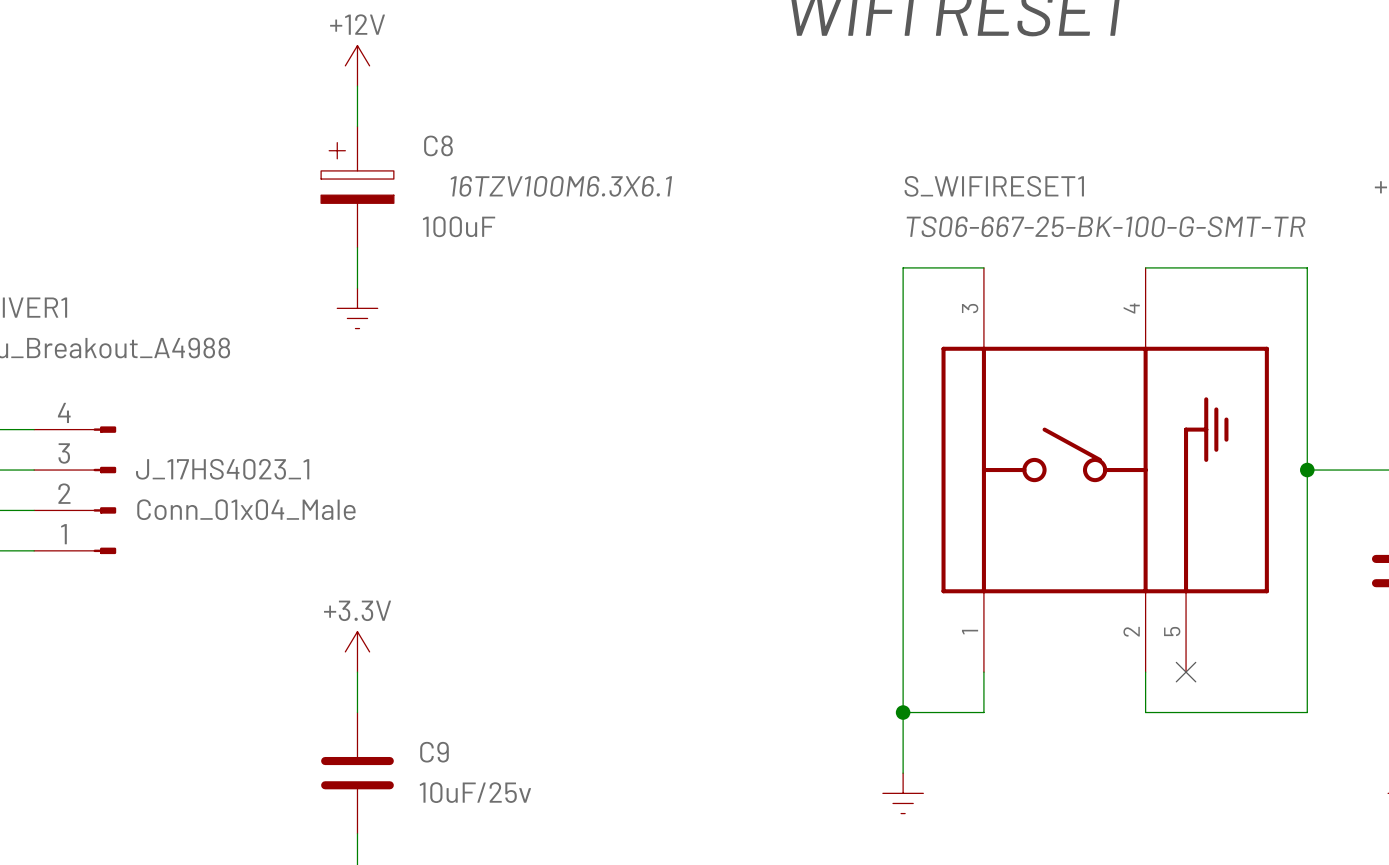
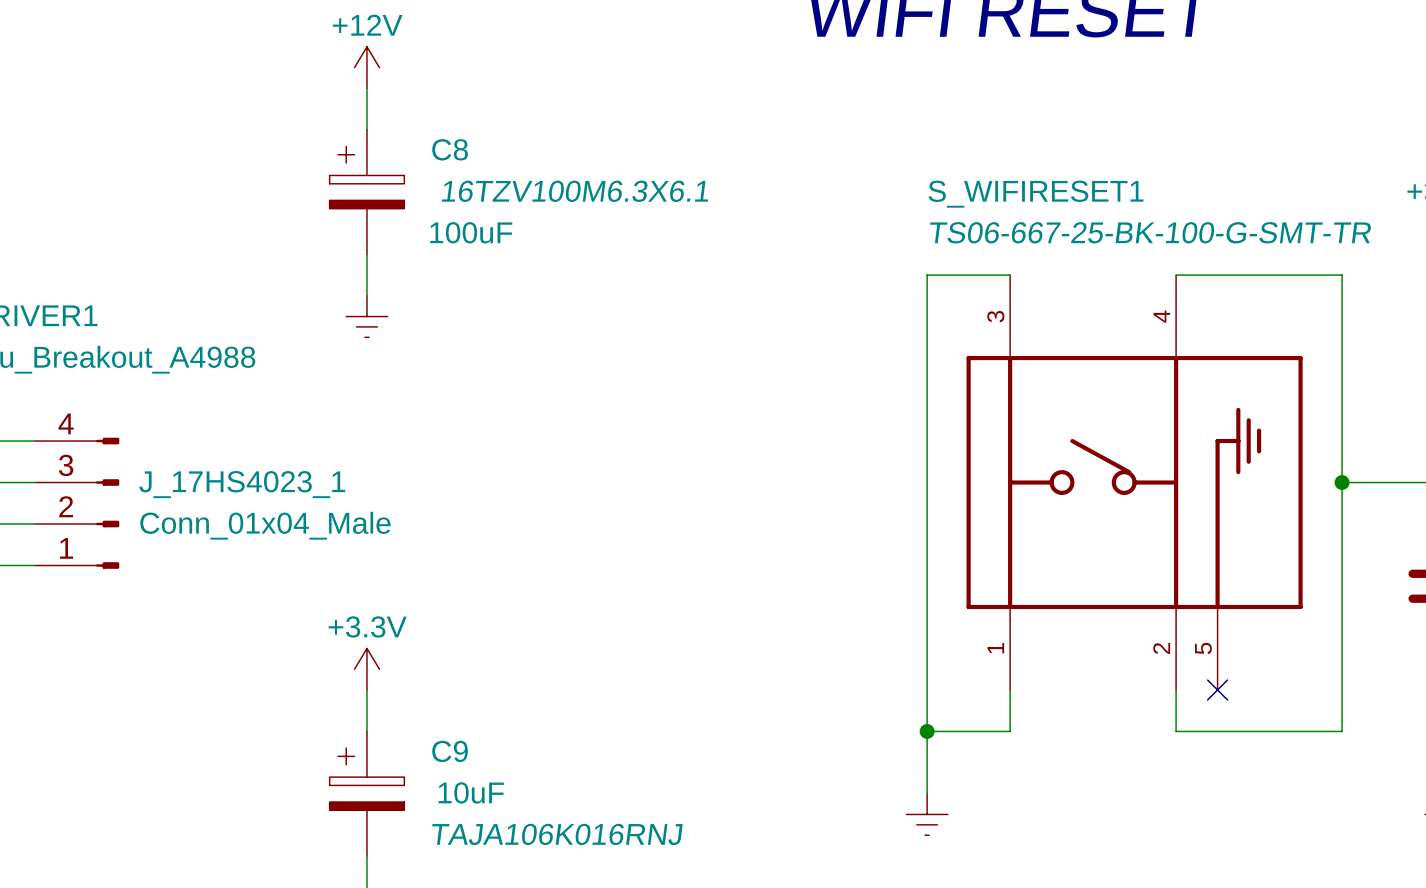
C9 symbol: [321, 712, 394, 834] -> [329, 731, 405, 856]
C9 value: 10uF/25v (475, 792) -> 10uF (471, 792)
C9 text: none -> TAJA106K016RNJ (557, 834)

